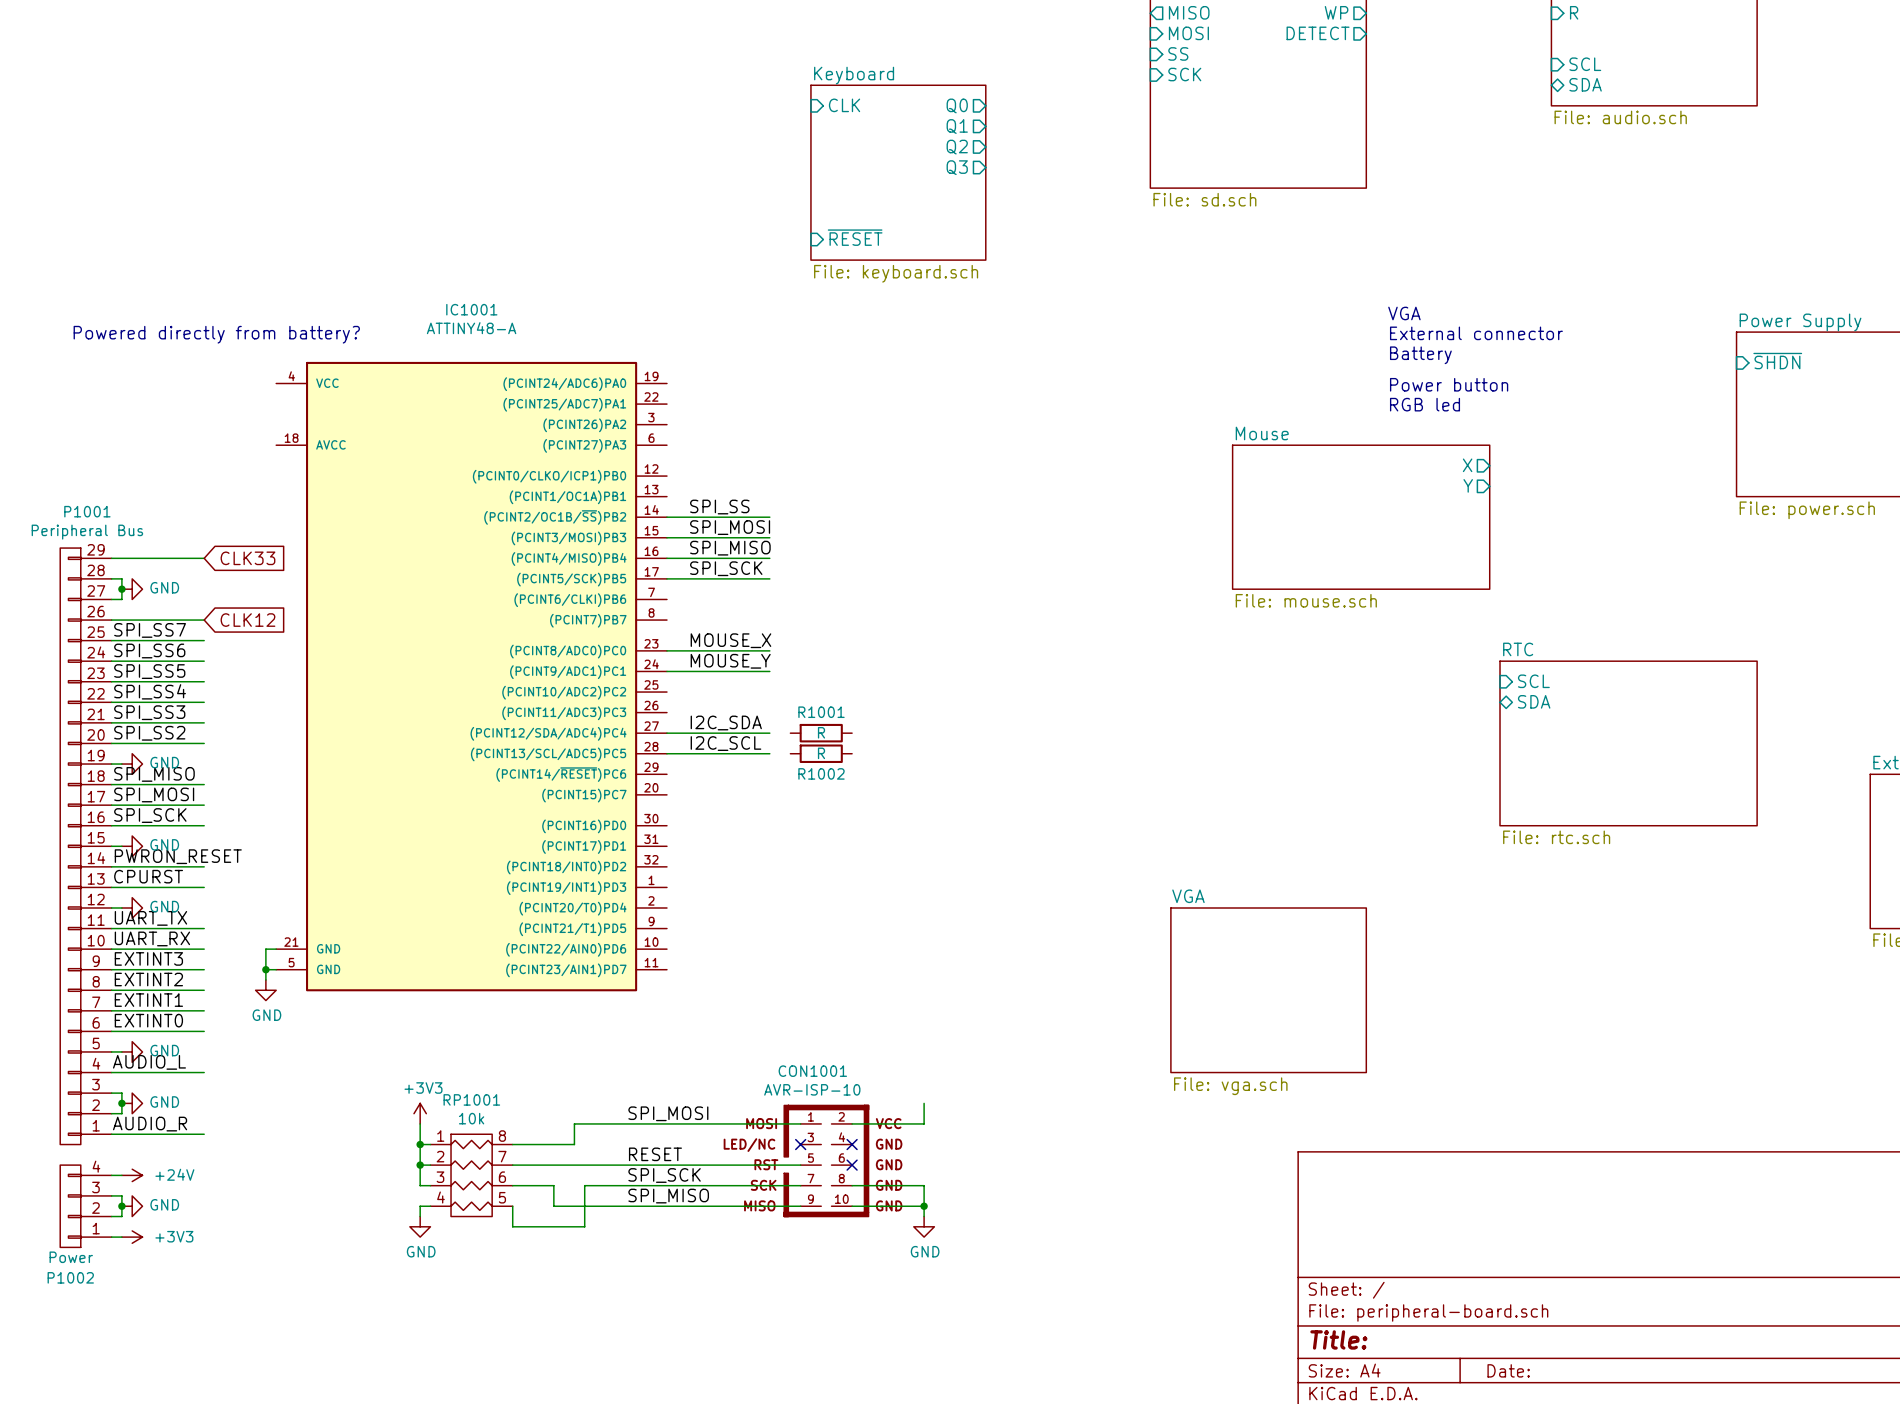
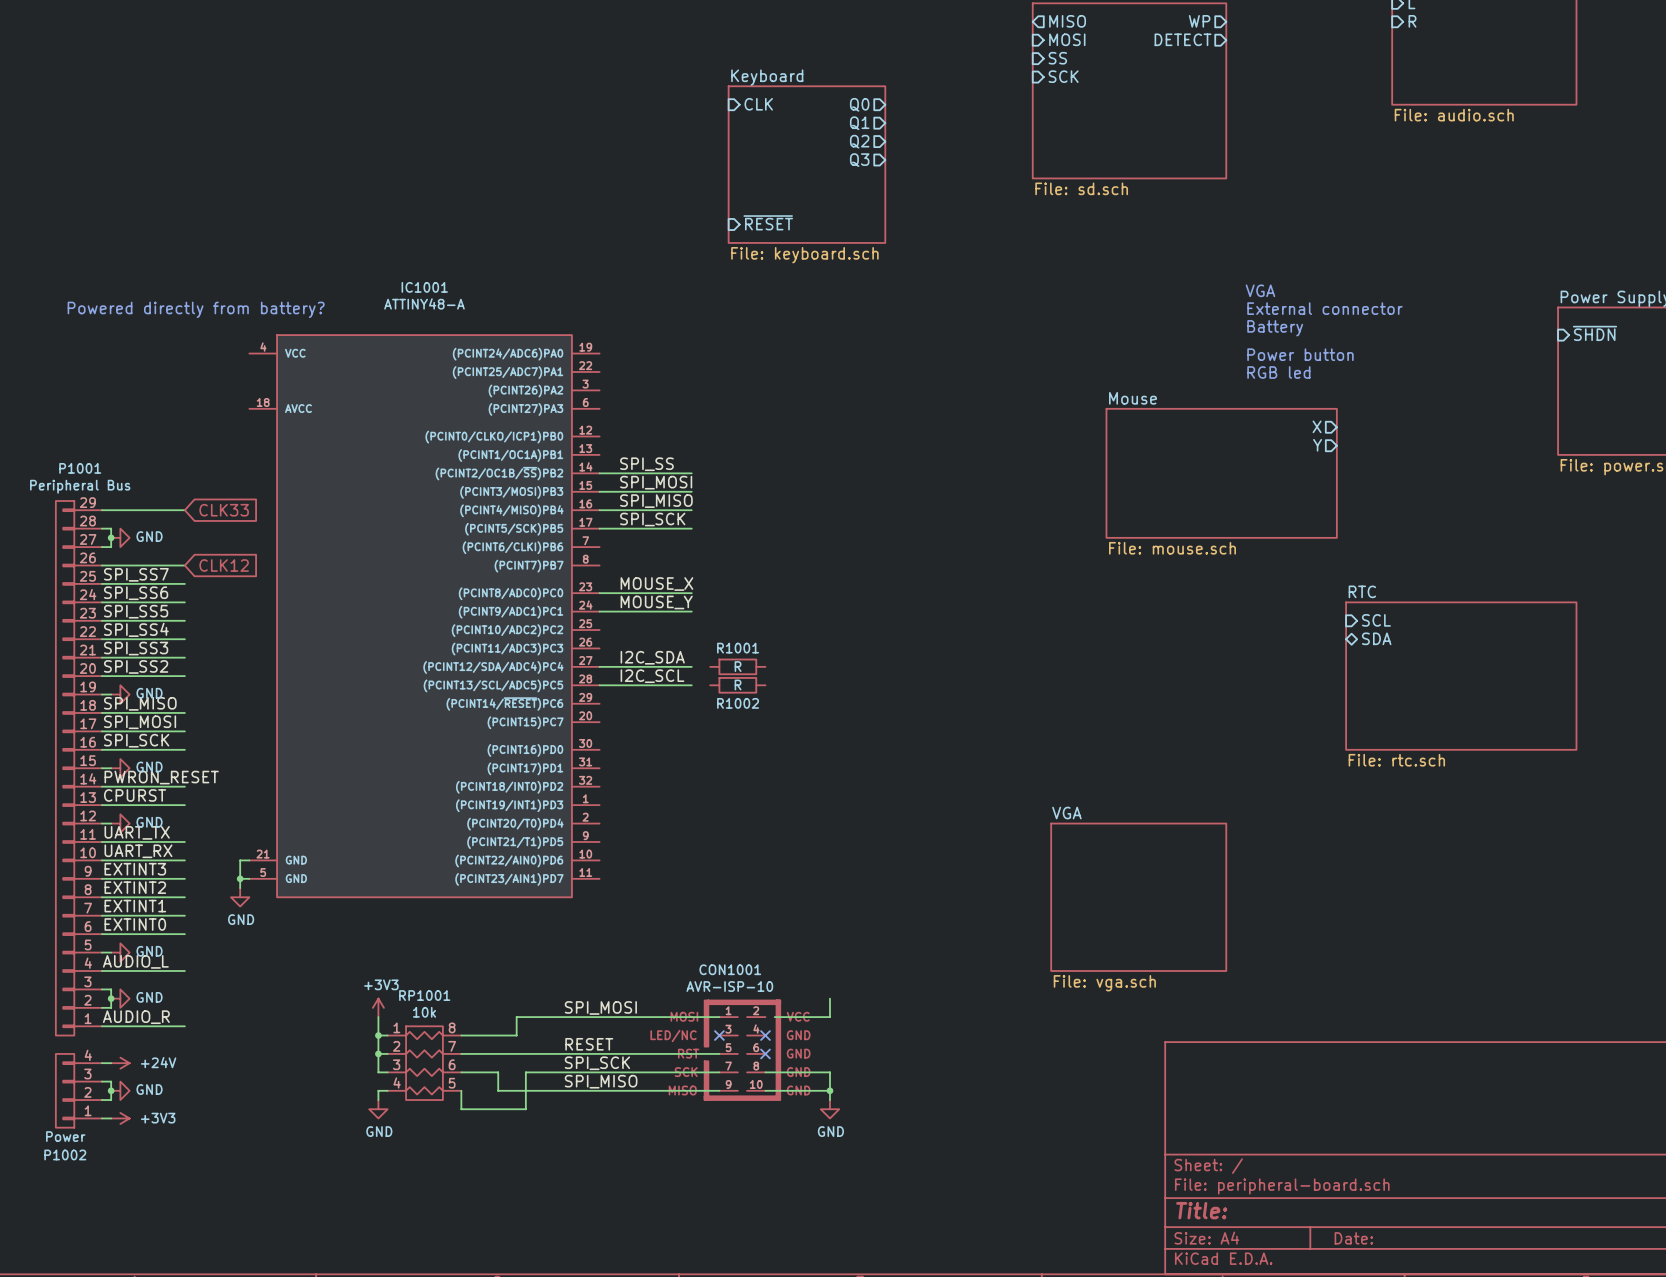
sheet pin: SCL (1585, 64) -> none
sheet pin: SDA (1585, 84) -> none
wire: (852, 1123) (862, 1123) -> none

